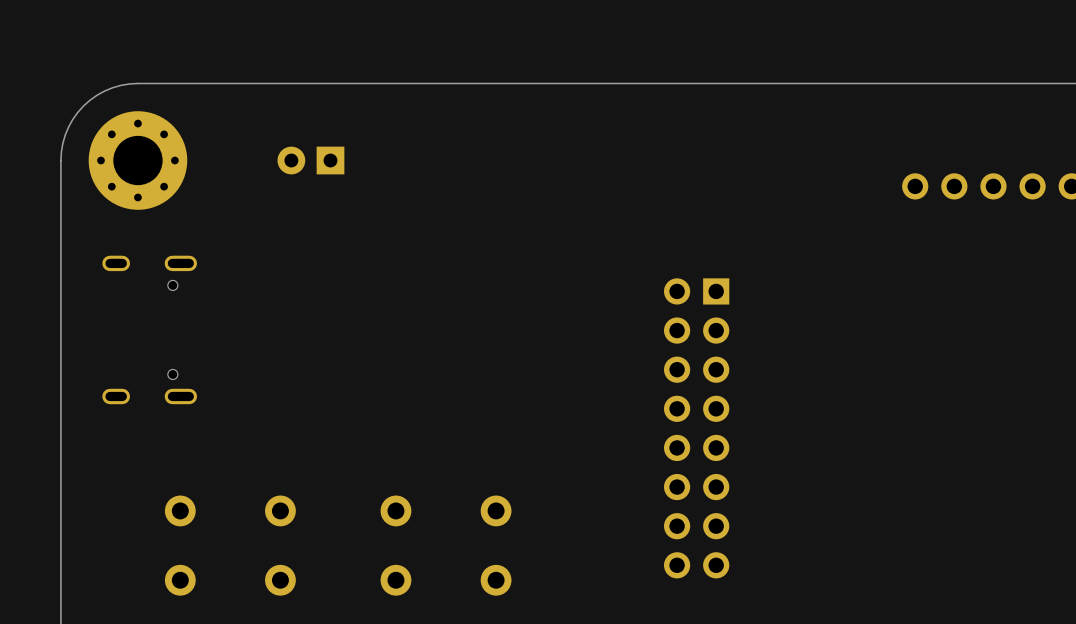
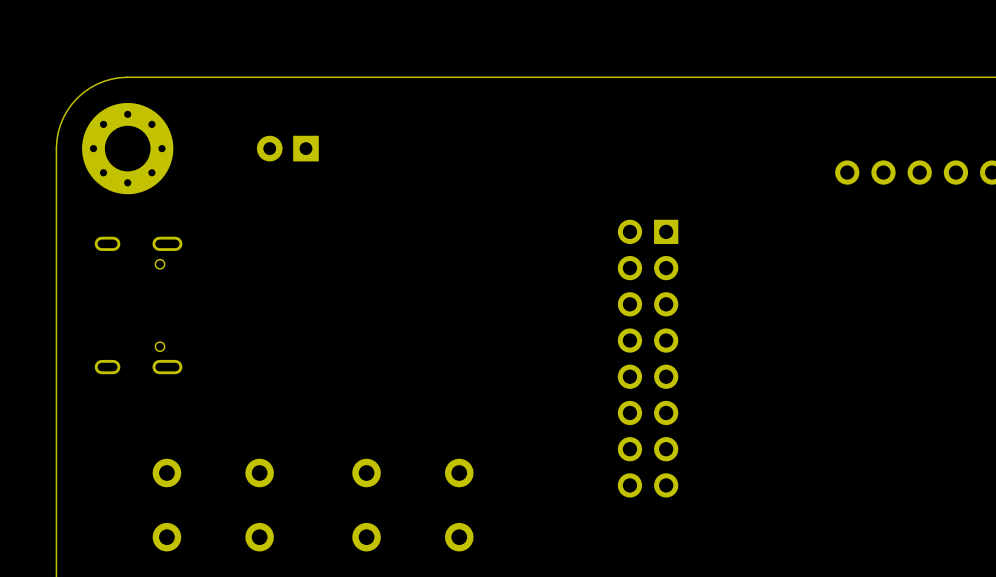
part position: (696, 428) -> (648, 358)

